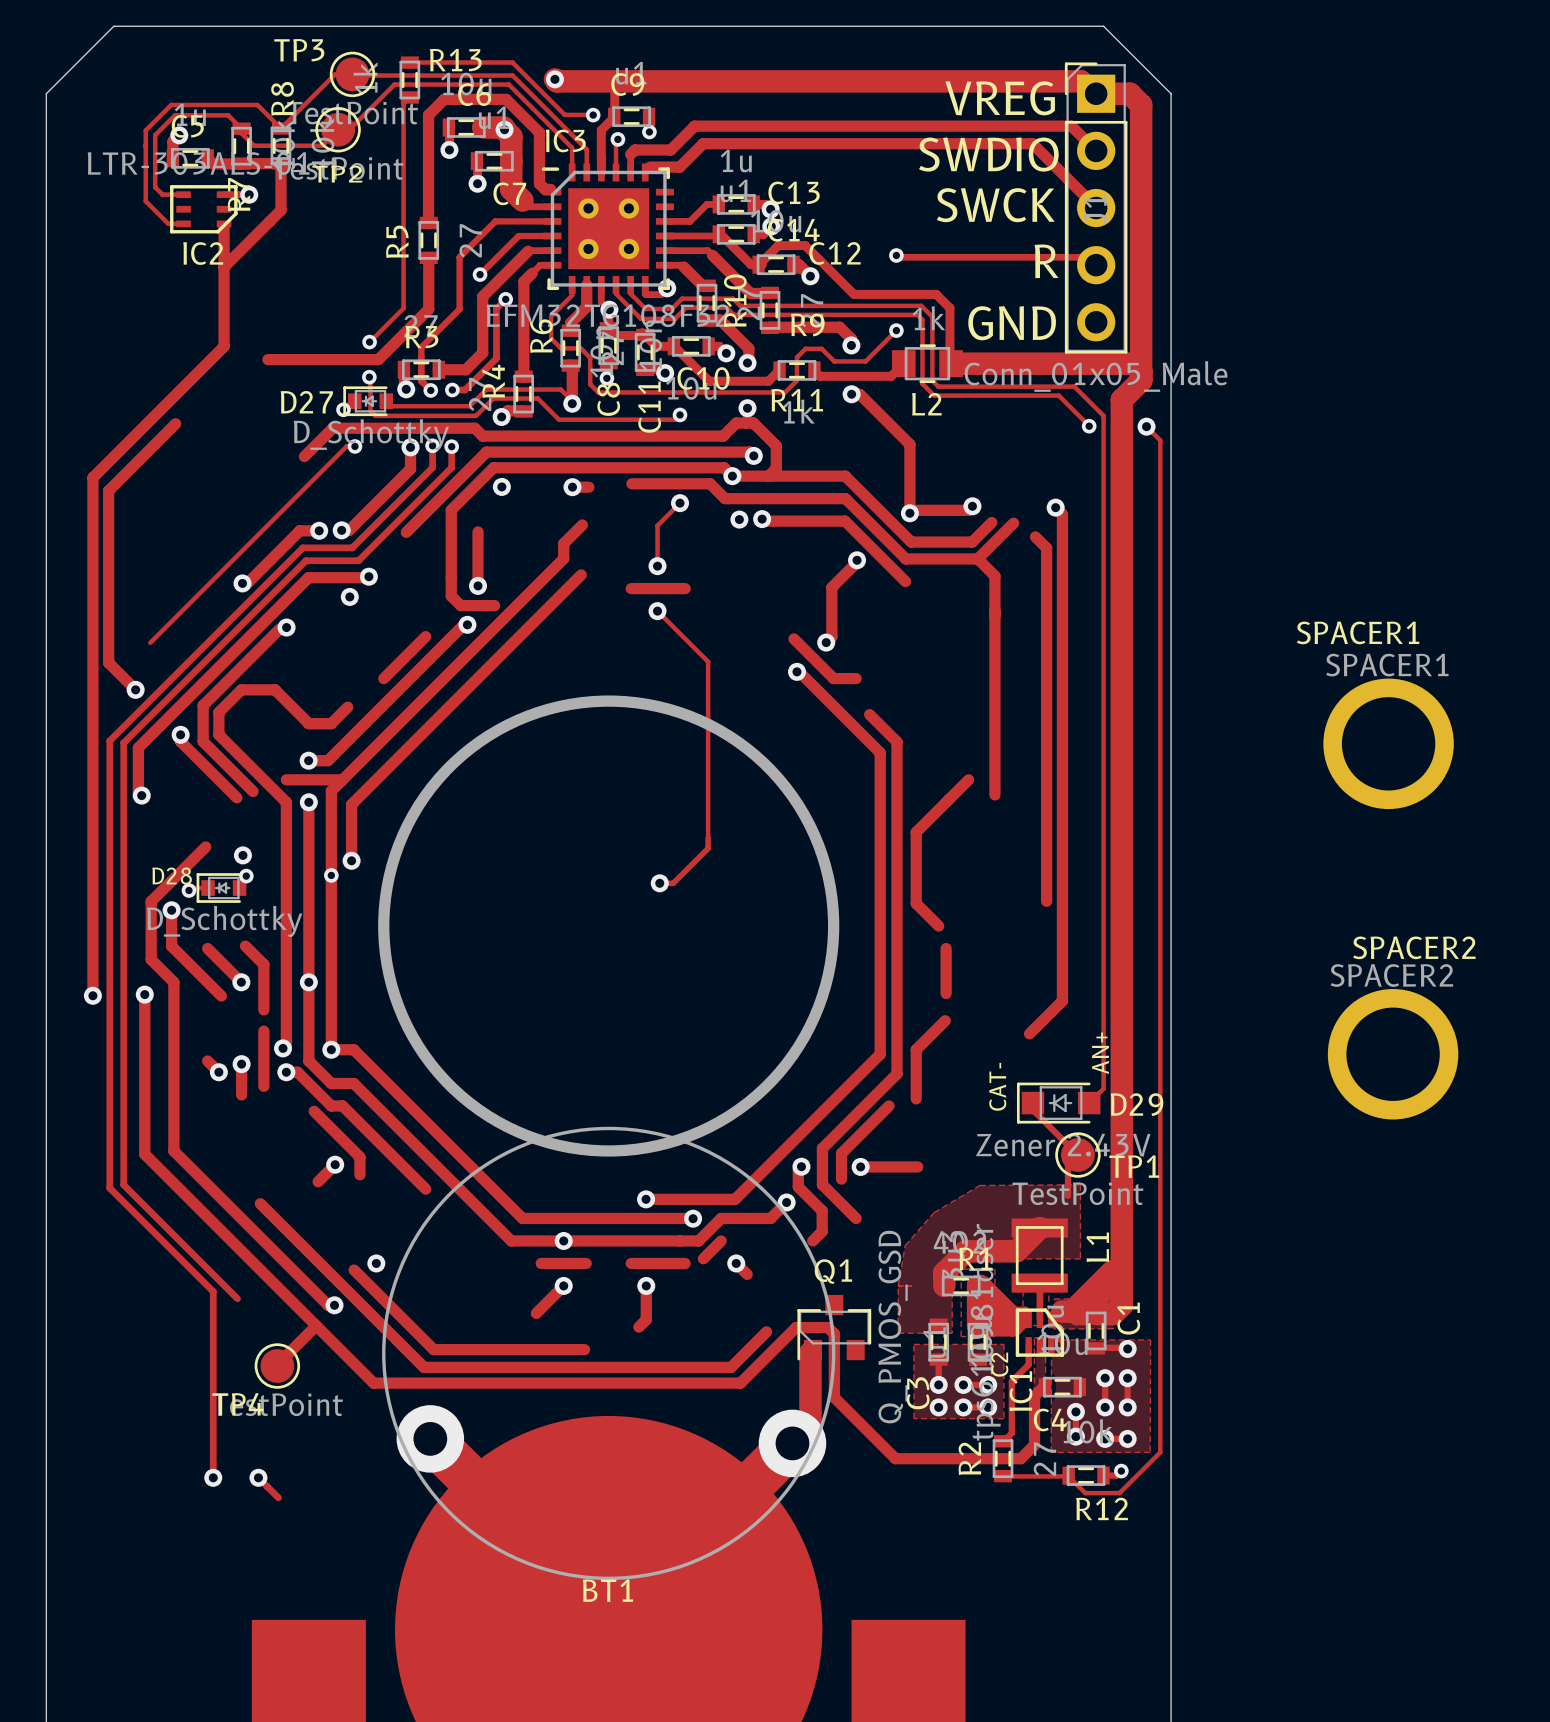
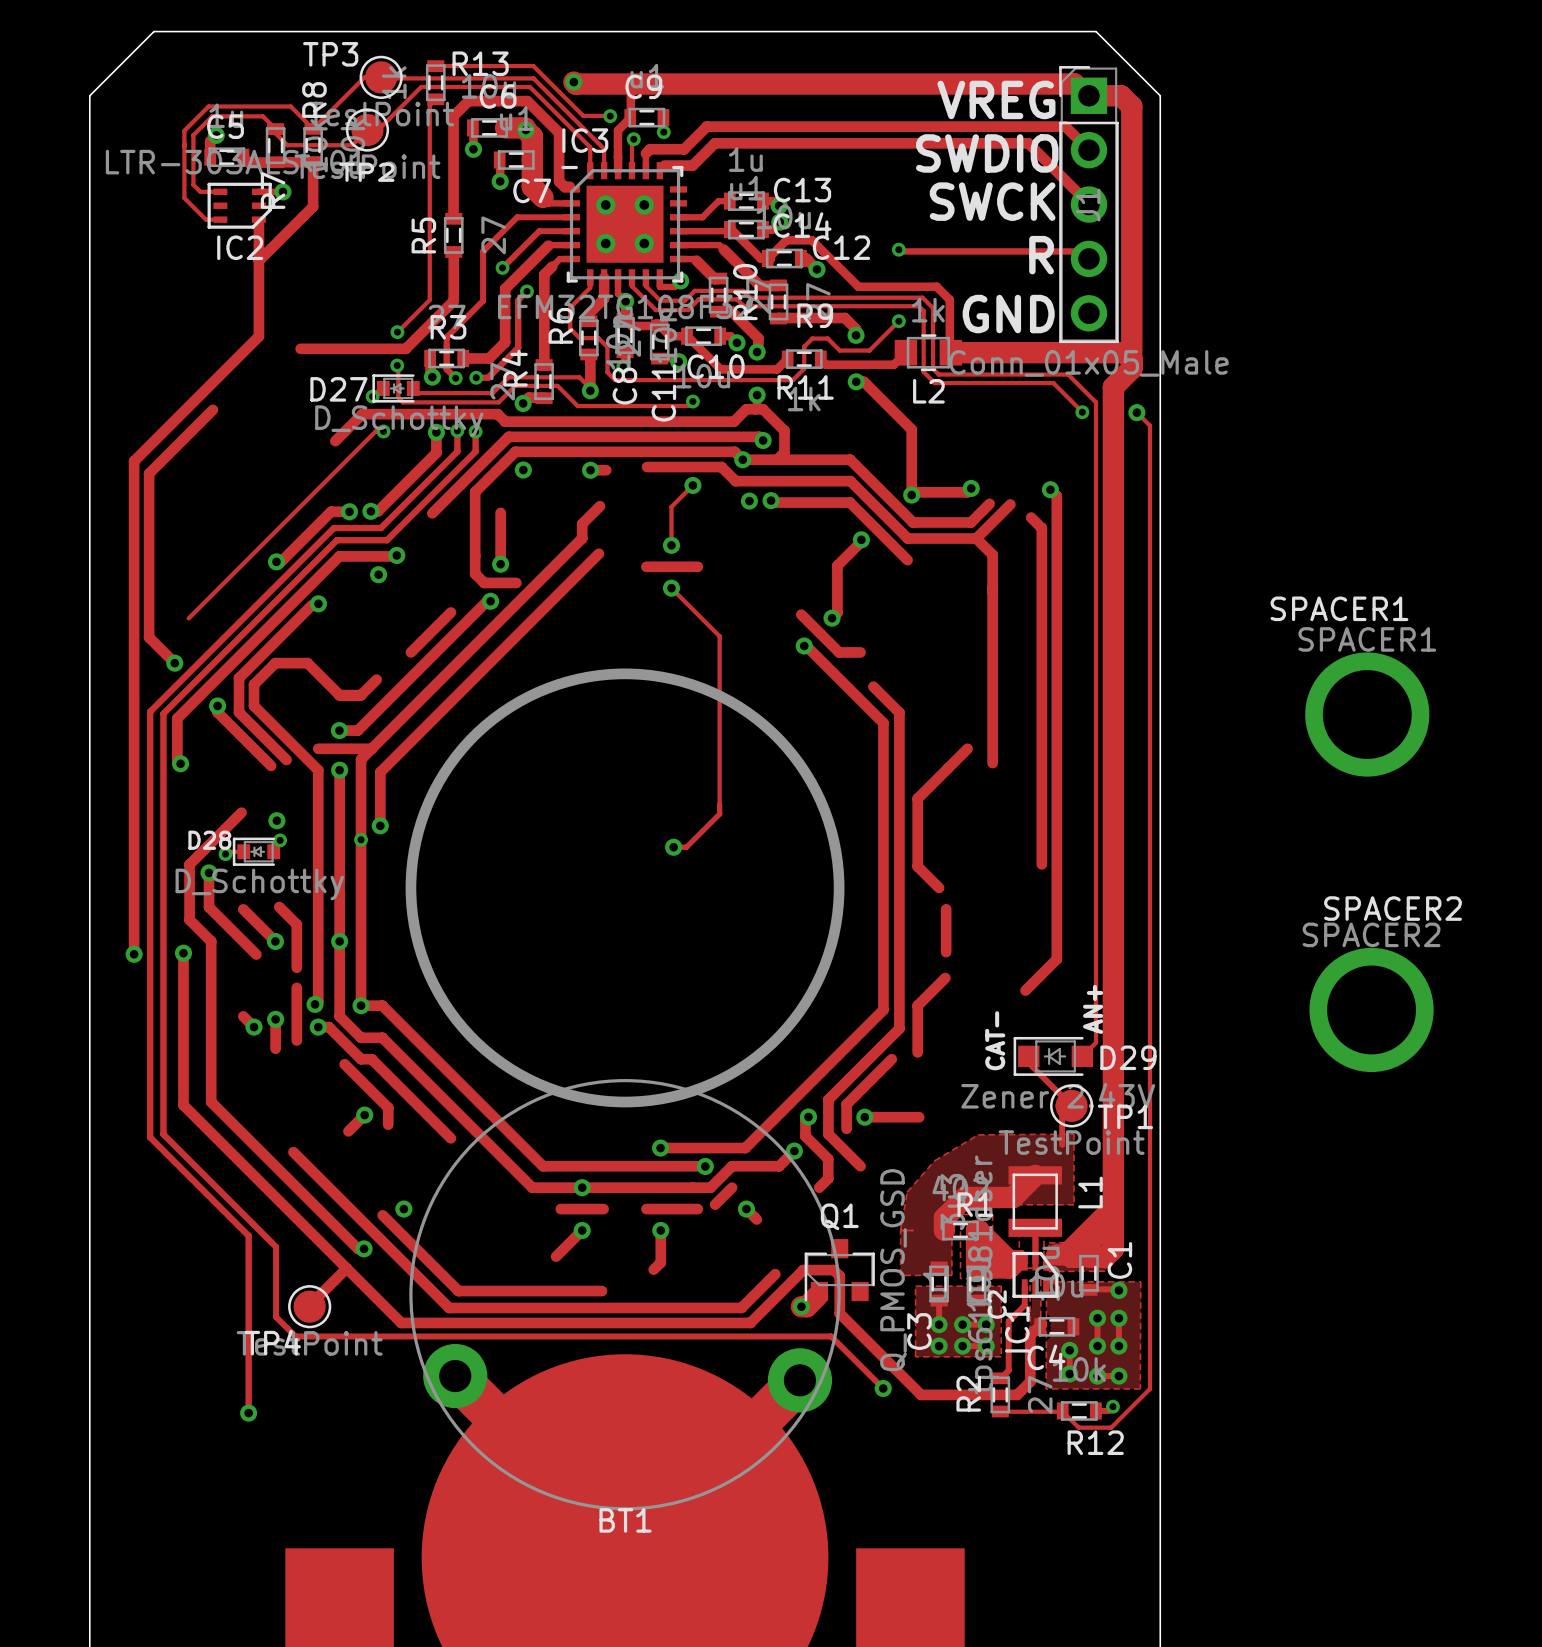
track: none -> (271, 1242) (276, 1246) (276, 1316) (295, 1336) (831, 1336) (883, 1388)
track: (810, 1352) (810, 1425) (792, 1443) -> none
track: none -> (817, 1295) (806, 1306) (801, 1306)
via: none -> (801, 1306)
track: (834, 1373) (834, 1397) (895, 1458) (919, 1458) -> (839, 1313) (921, 1394)
via: none -> (883, 1388)
track: (258, 1477) (278, 1497) -> none
via: (258, 1477) -> none

